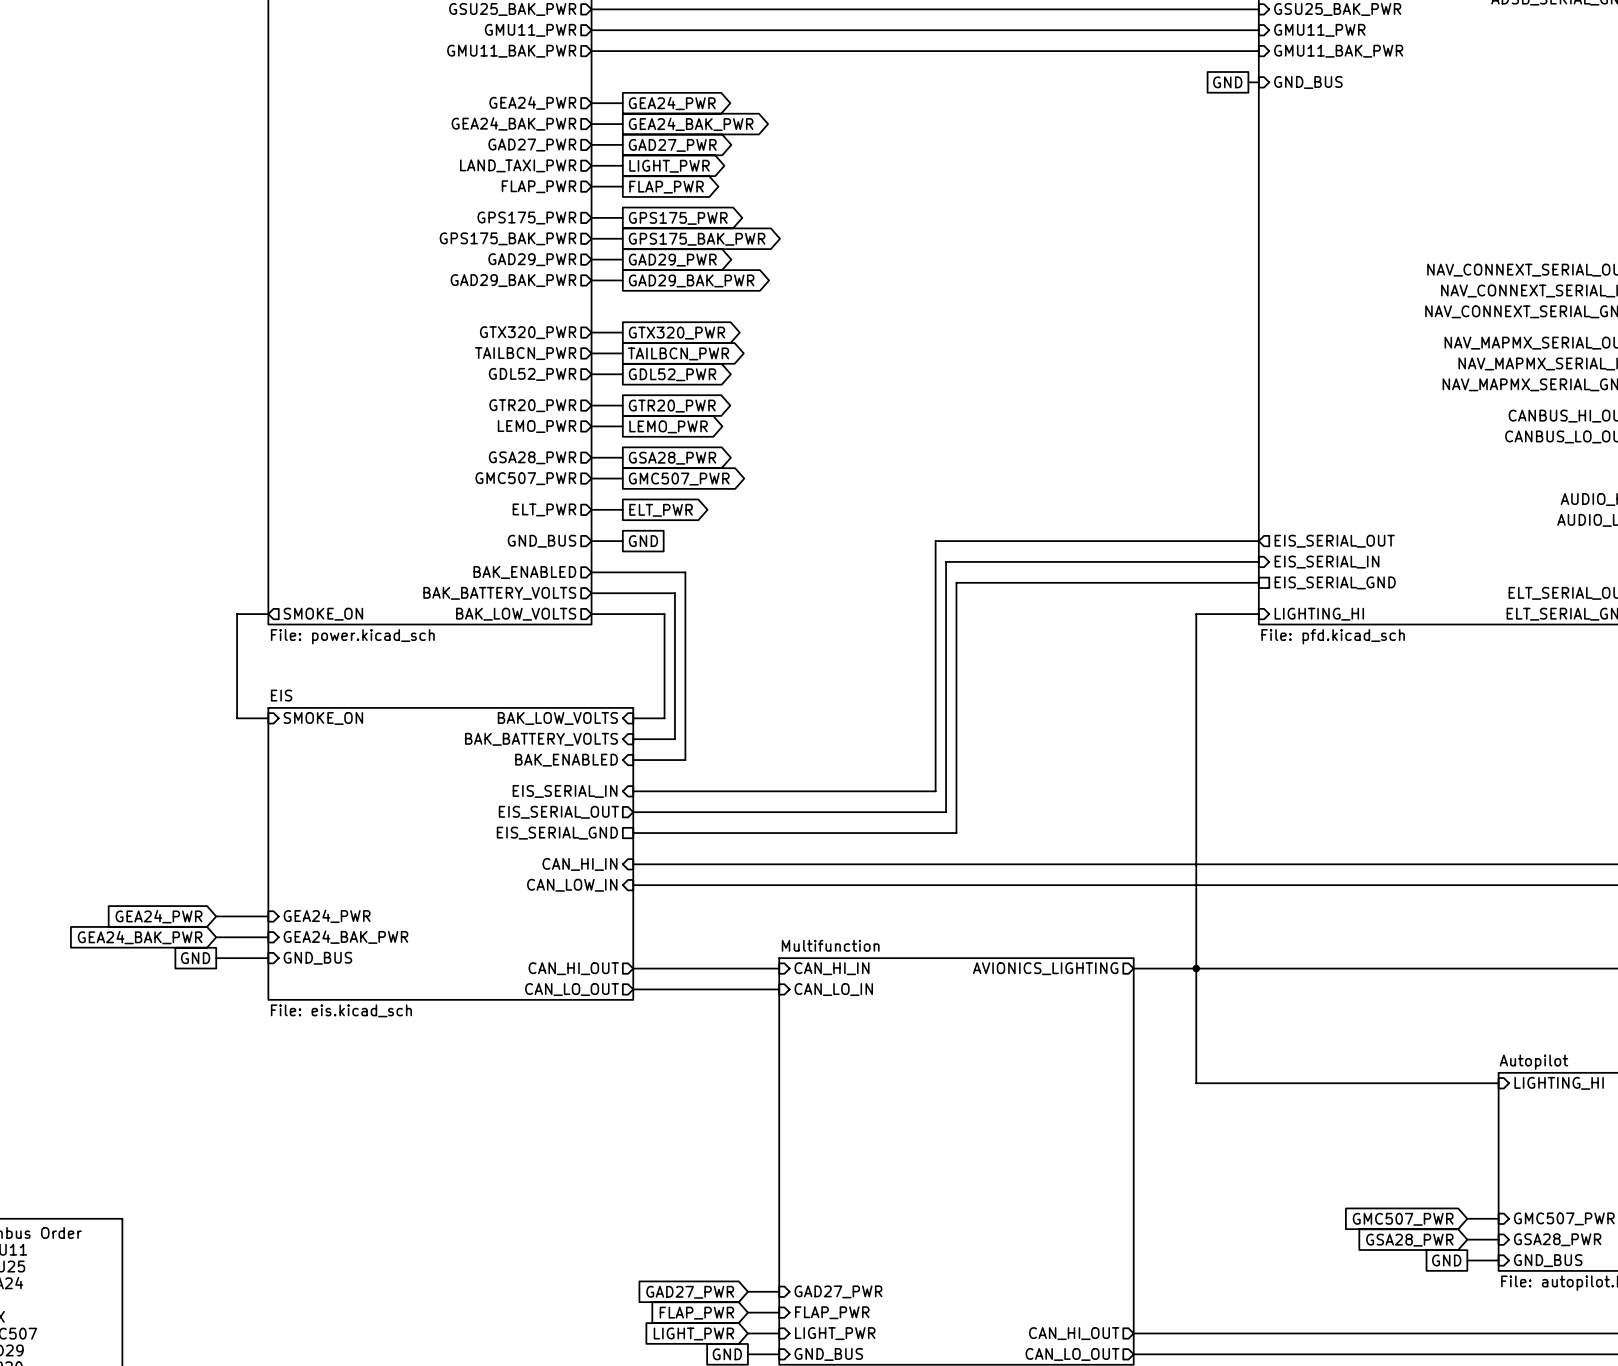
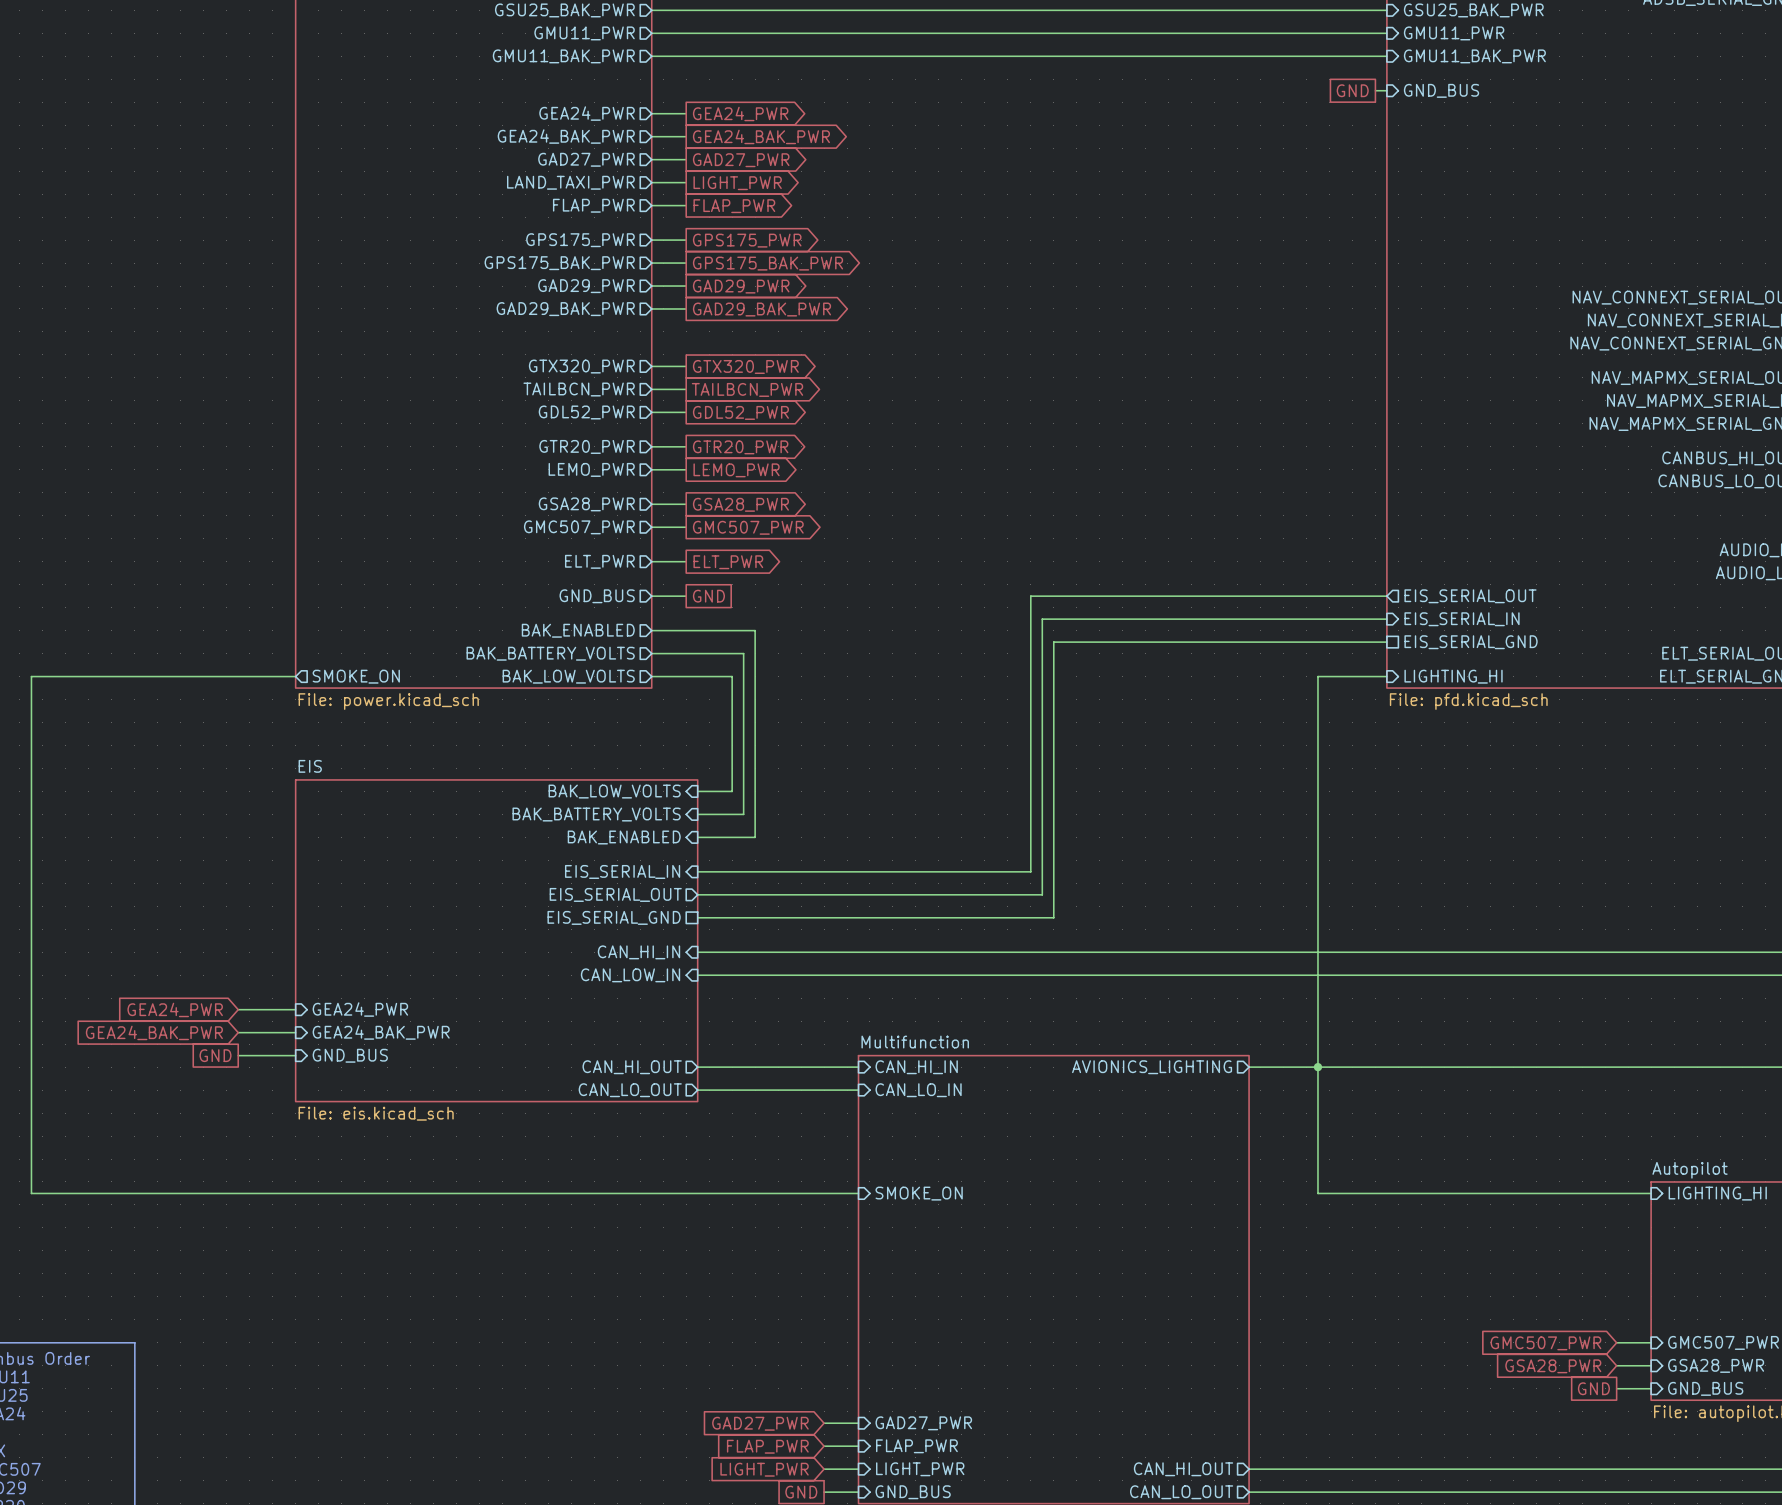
wire: (237, 614) (237, 718) (268, 718) -> (261, 676) (31, 676) (31, 1193) (858, 1193)
sheet pin: SMOKE_ON (323, 718) -> none
sheet pin: none -> SMOKE_ON (919, 1193)

